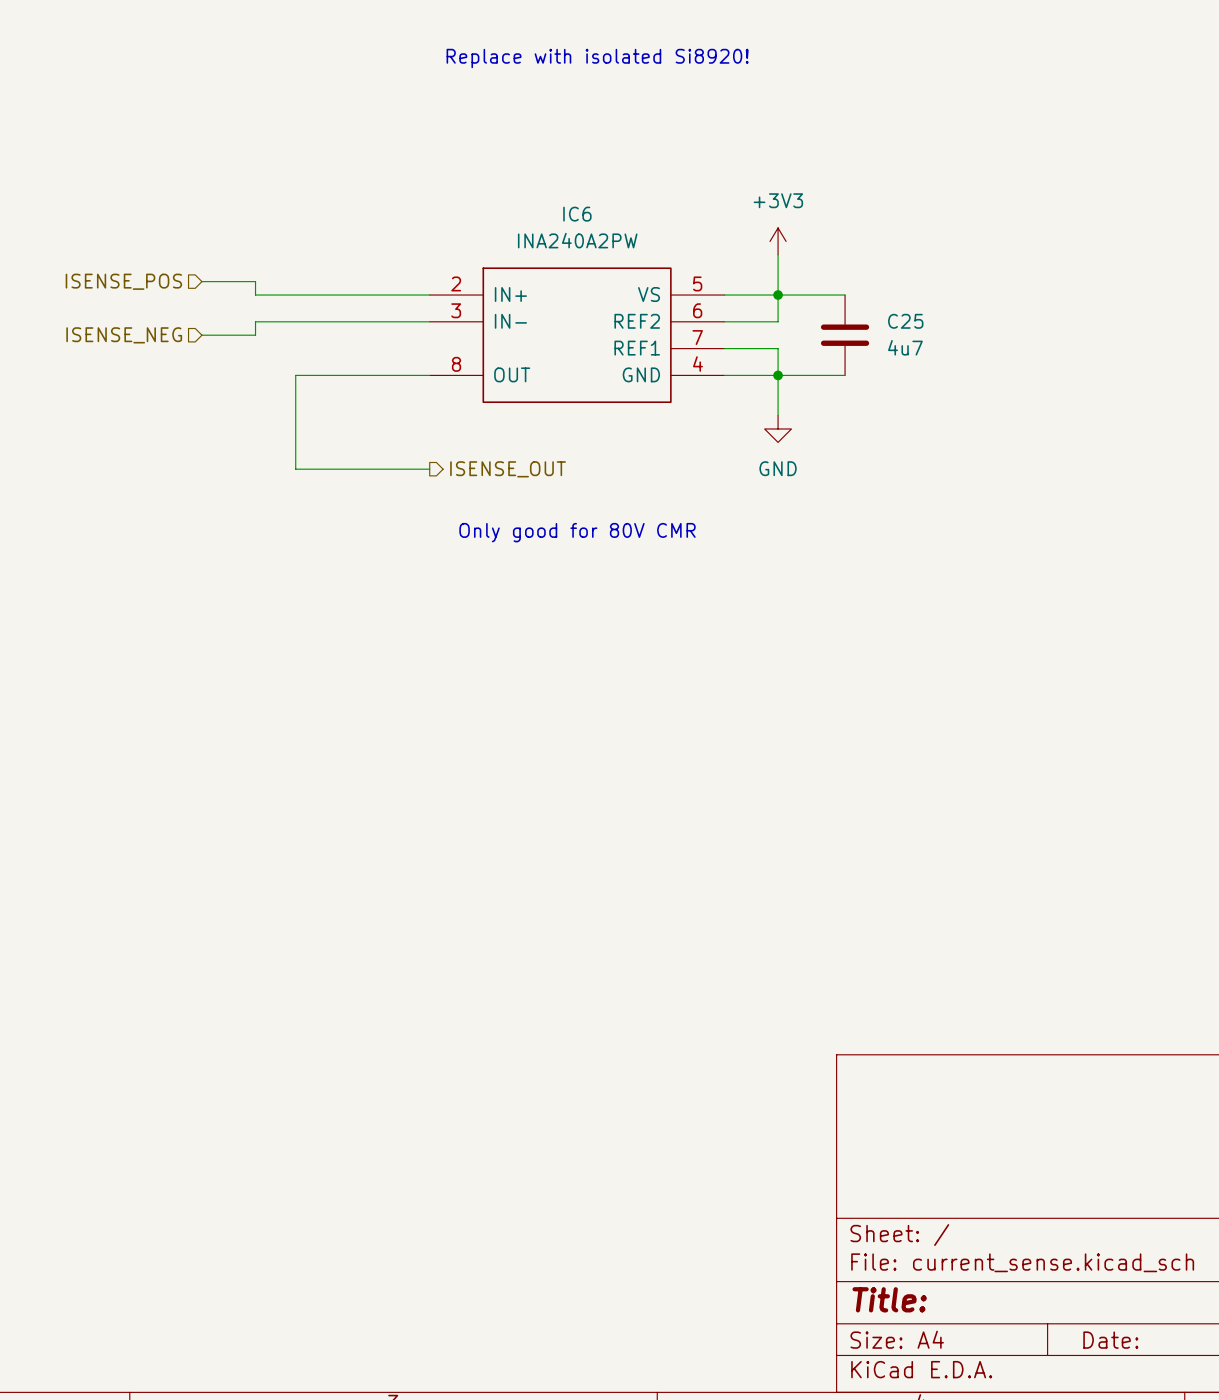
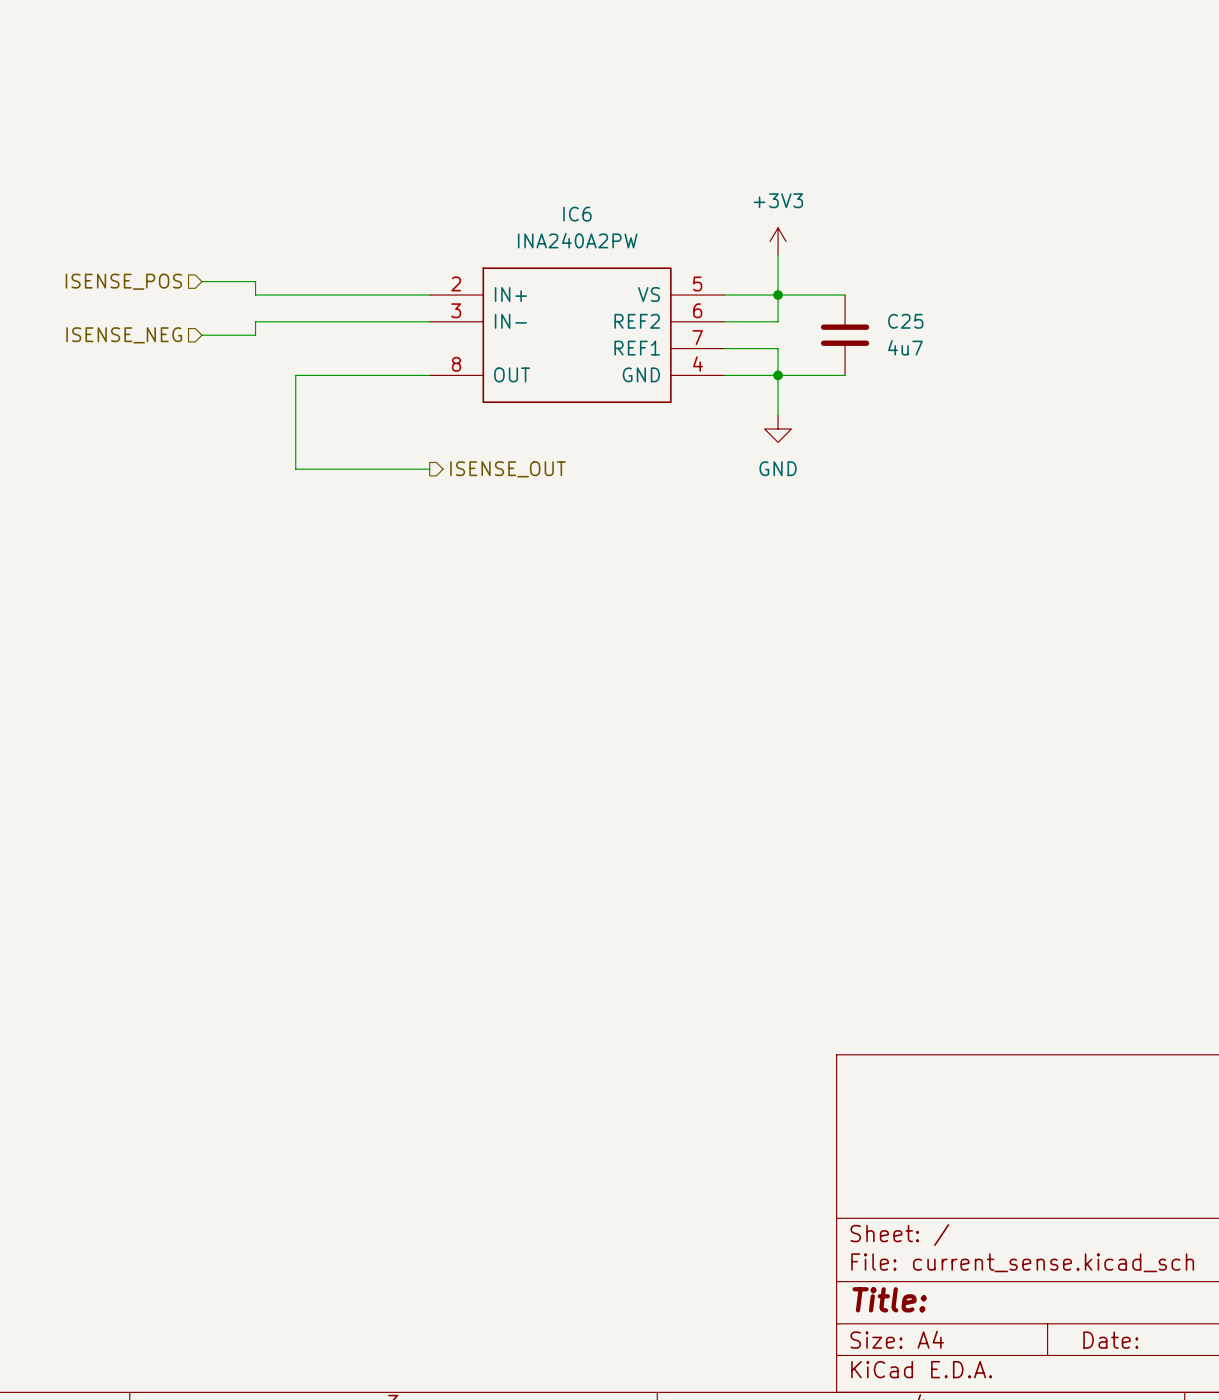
text: Replace with isolated Si8920! (597, 58) -> none
text: Only good for 80V CMR (577, 532) -> none

